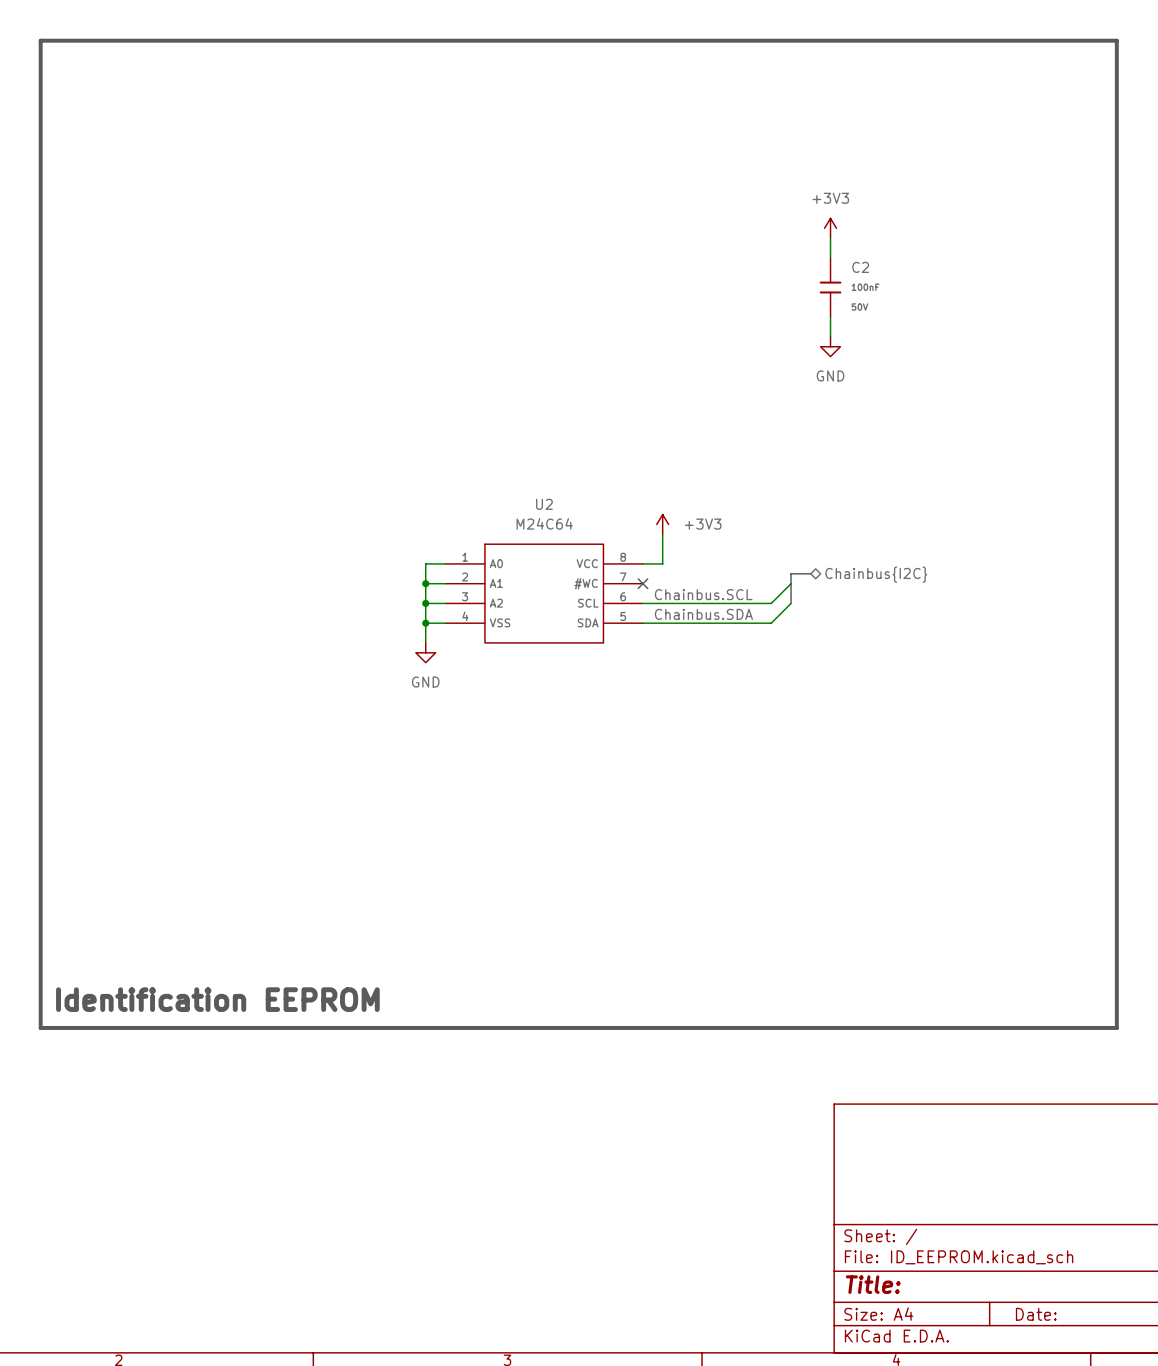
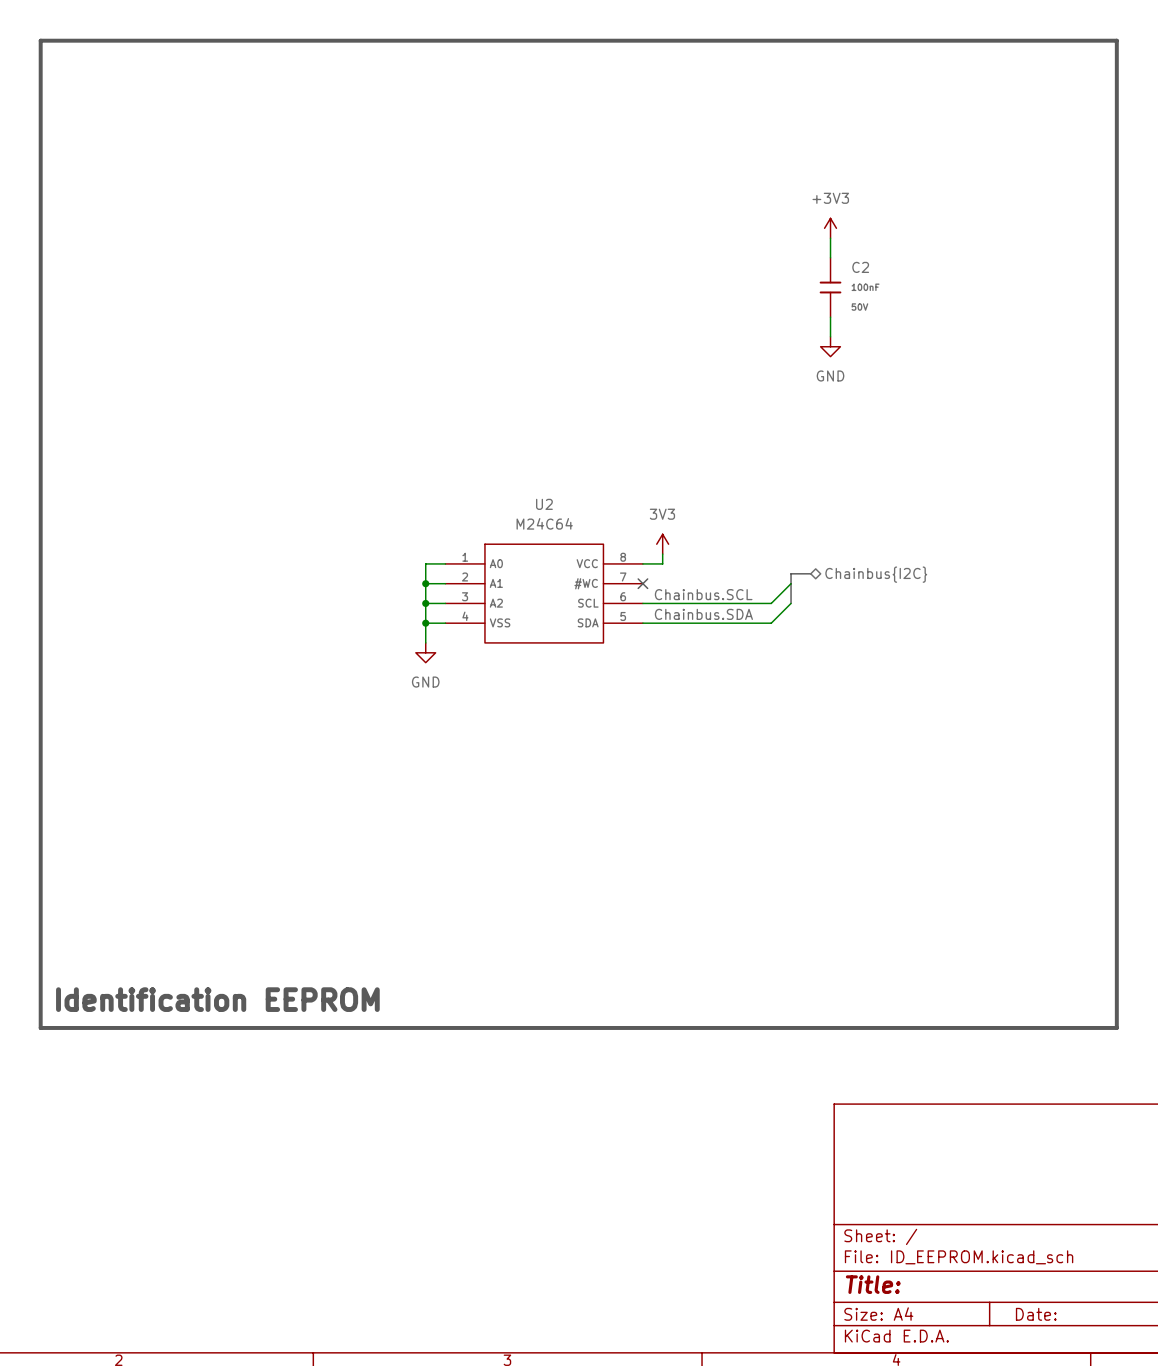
power symbol: +3V3 (662, 524) -> none
power symbol: none -> 3V3 (662, 544)

